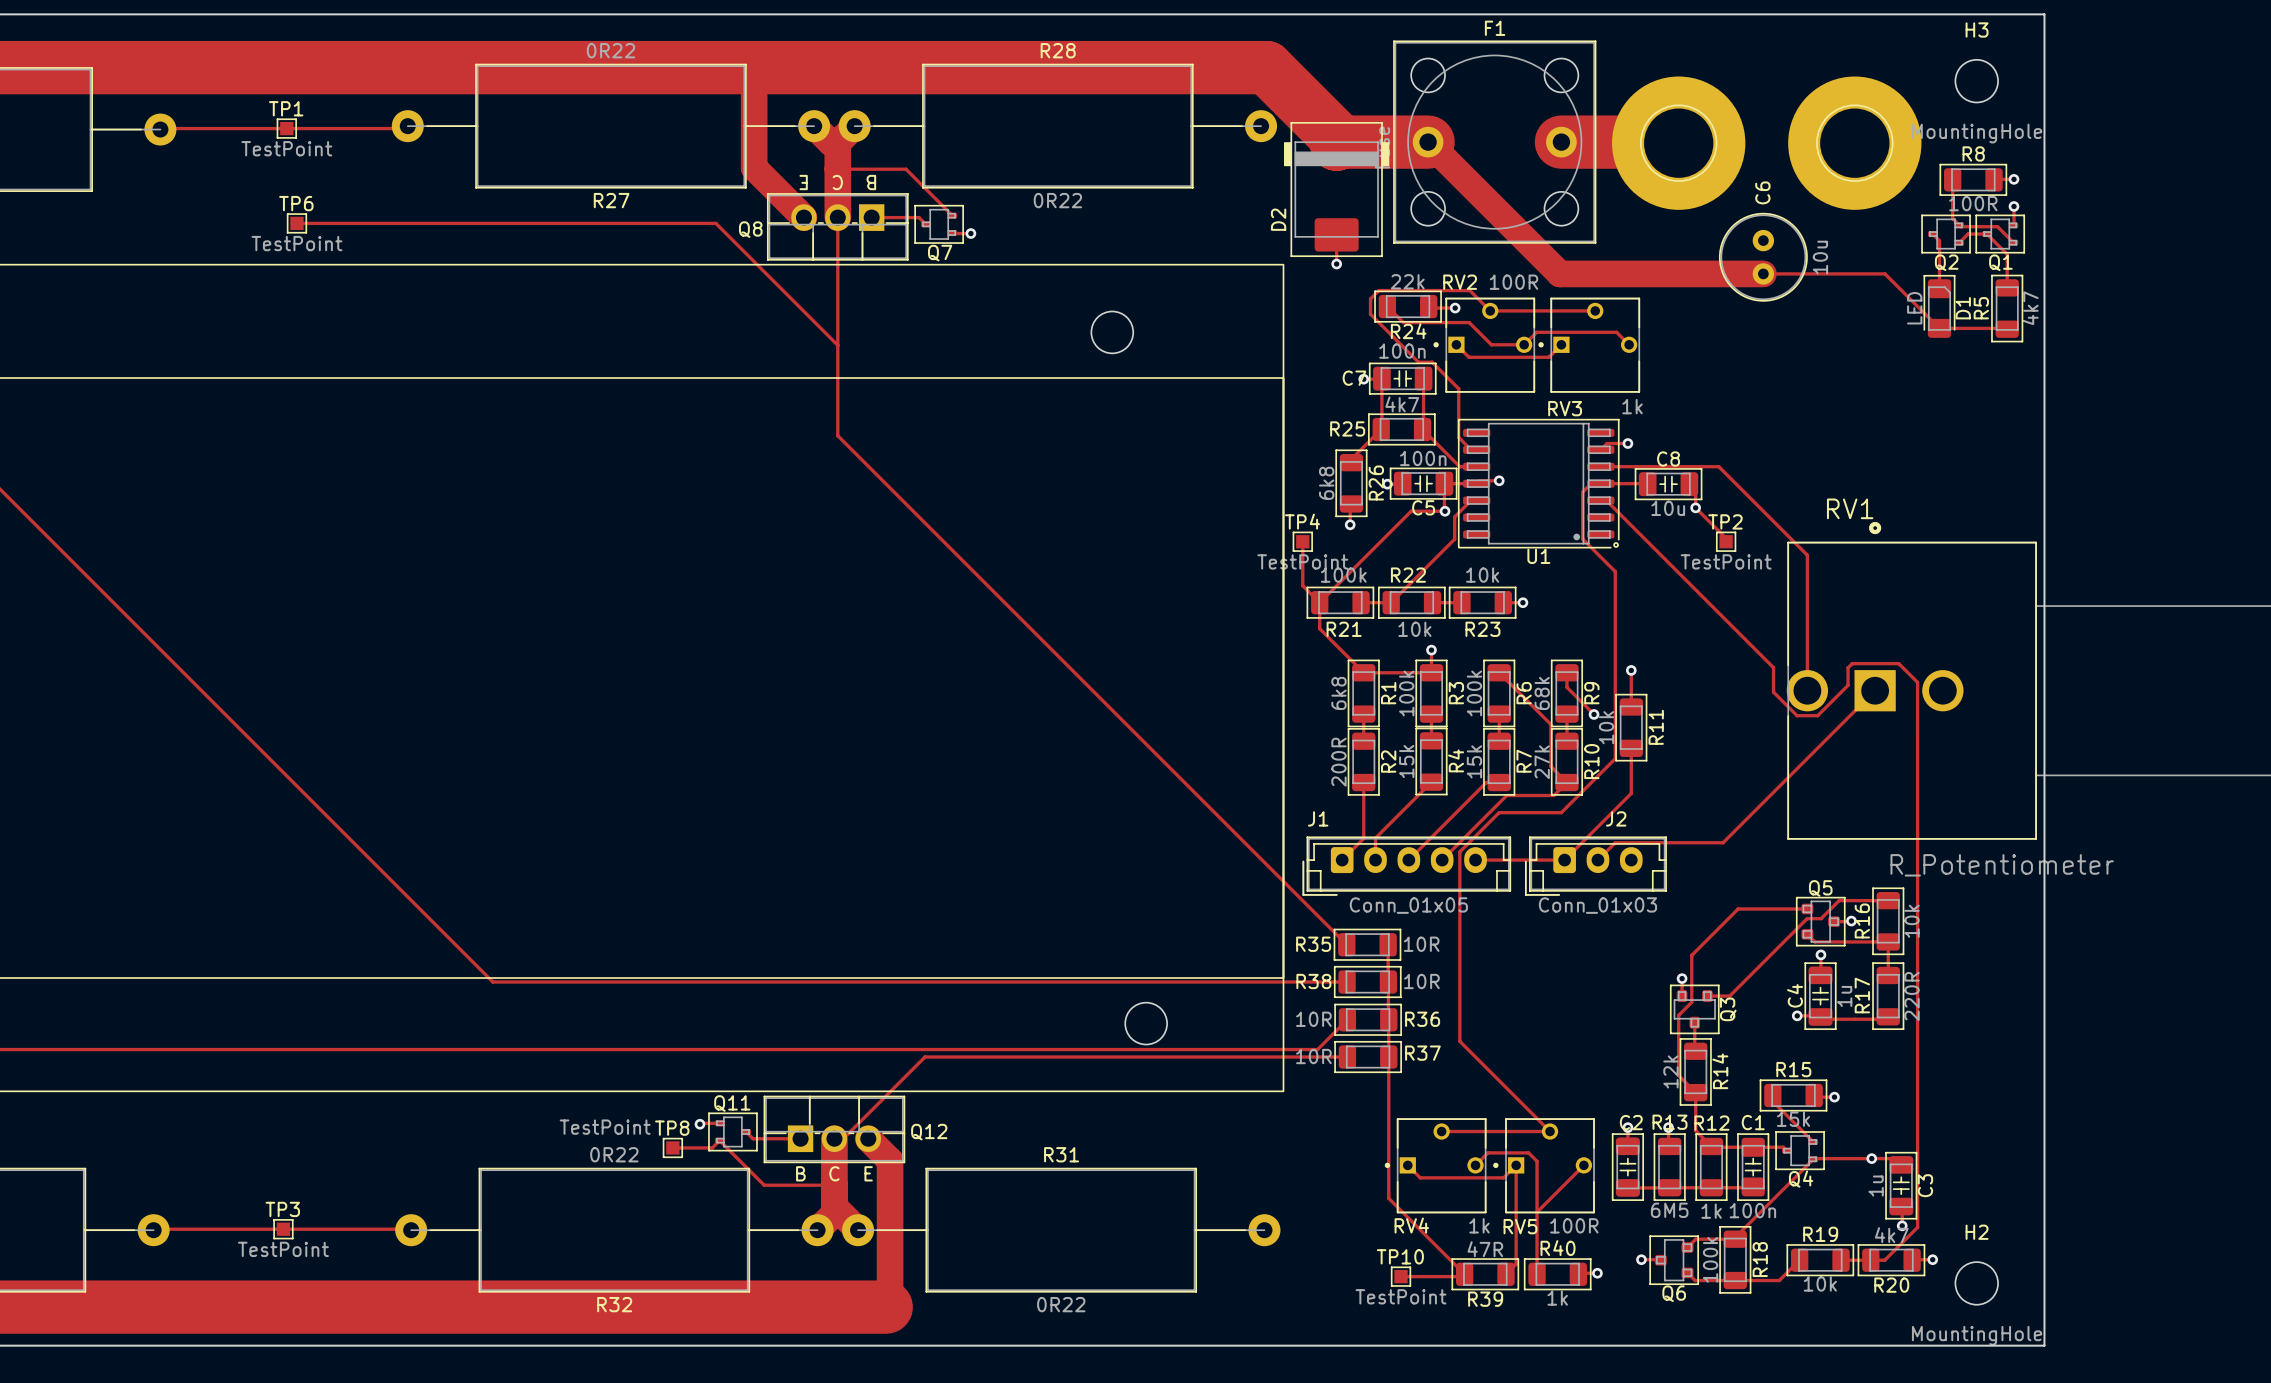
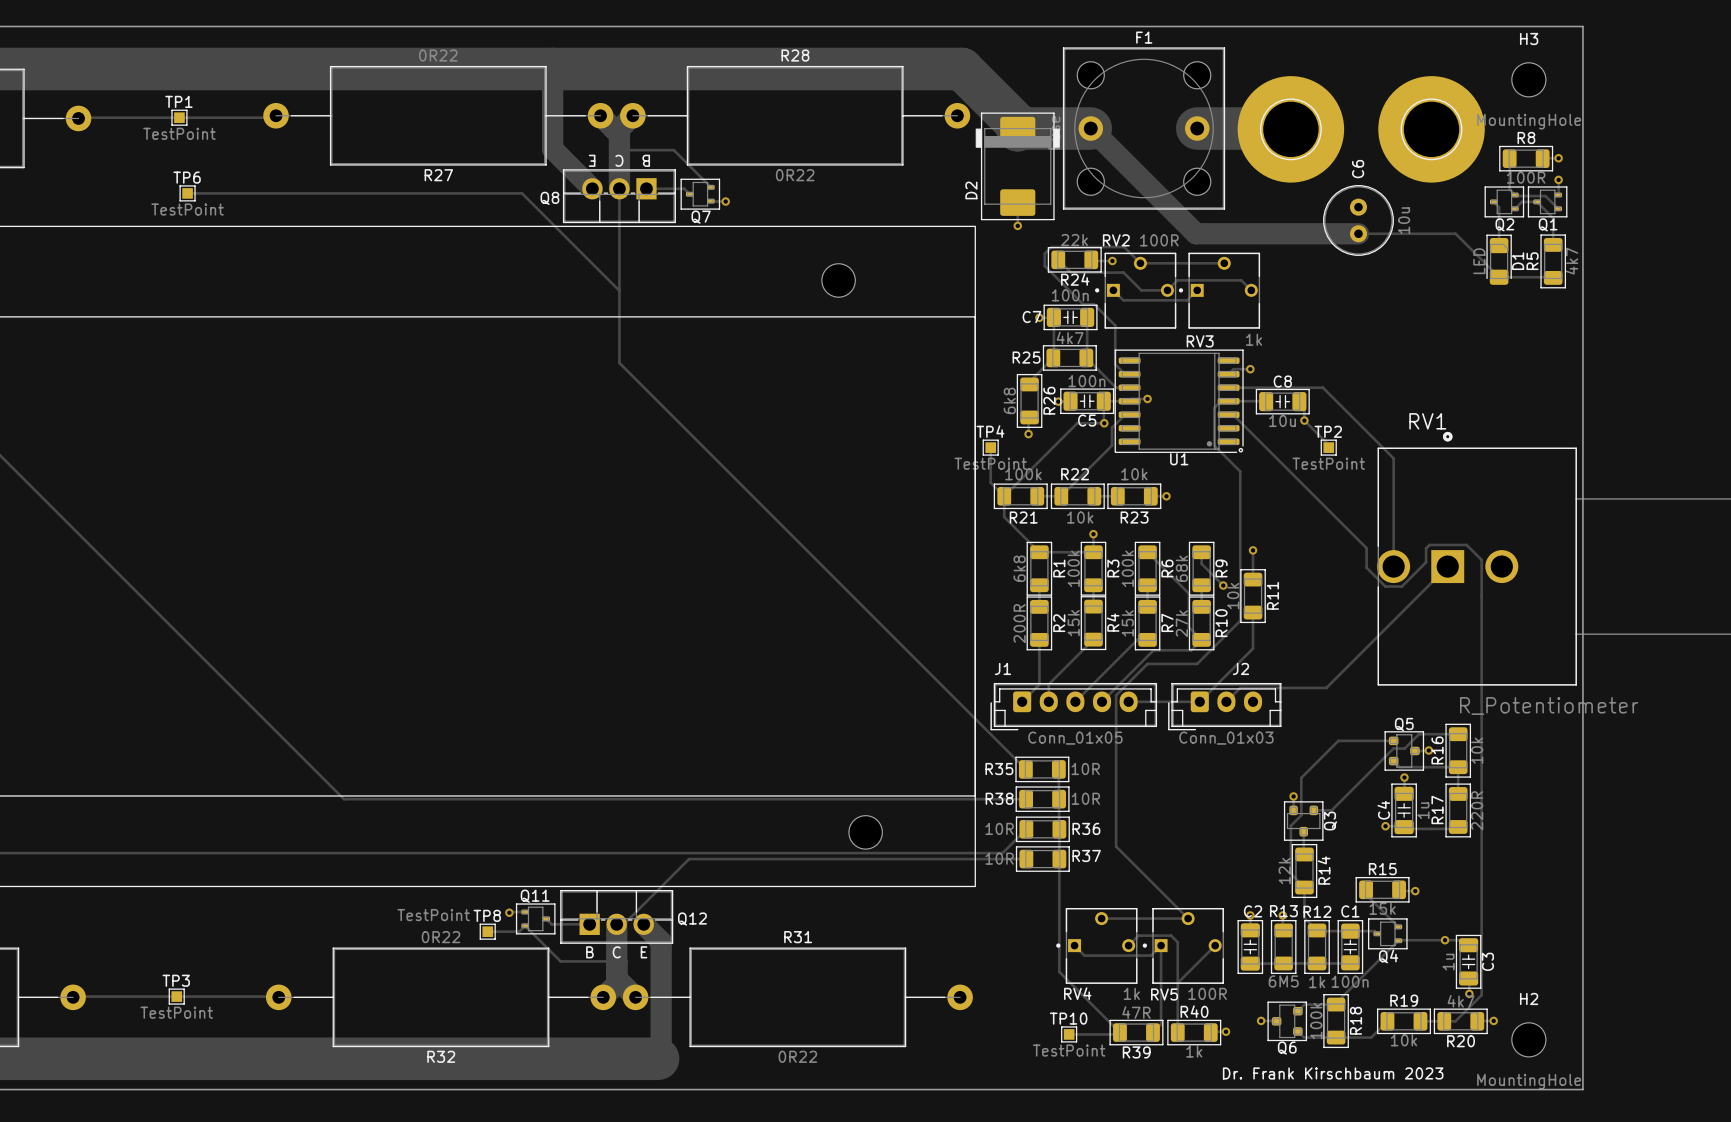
text: none -> Dr. Frank Kirschbaum 2023 (1333, 1073)

